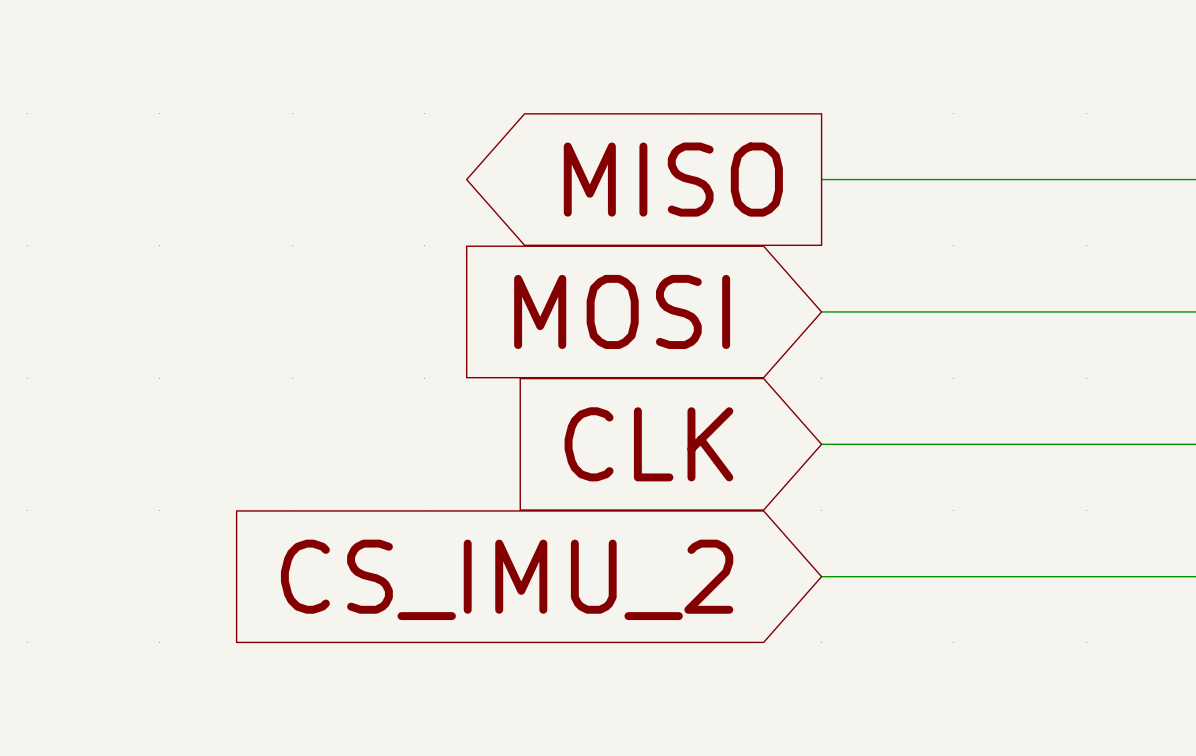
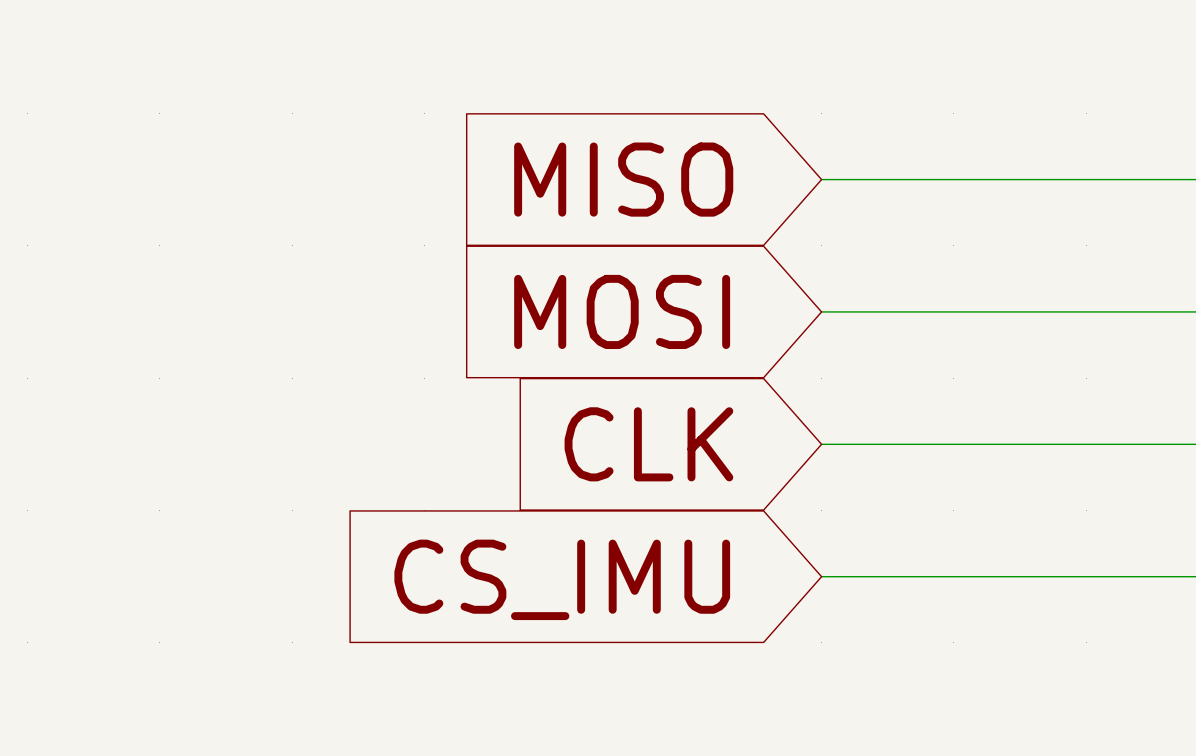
global label shape: output (673, 179) -> input (623, 179)
global label: CS_IMU_2 (507, 579) -> CS_IMU (562, 579)

